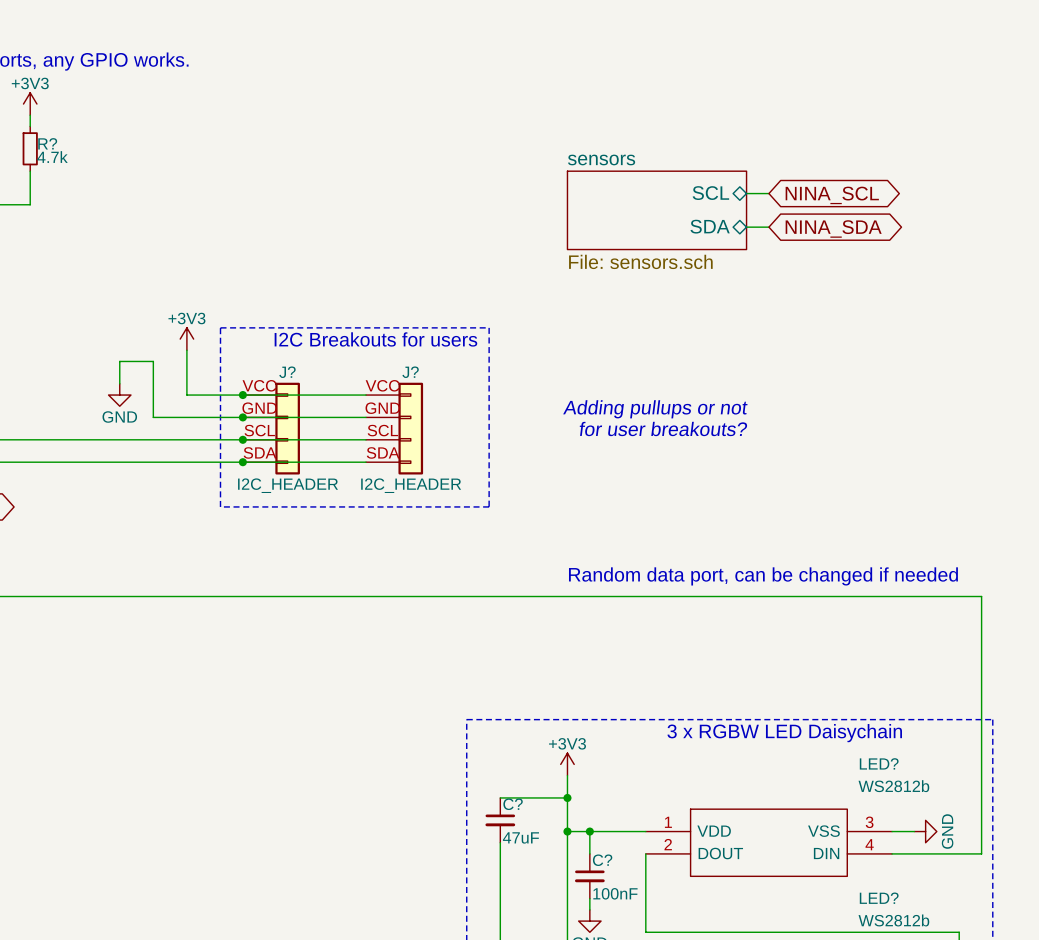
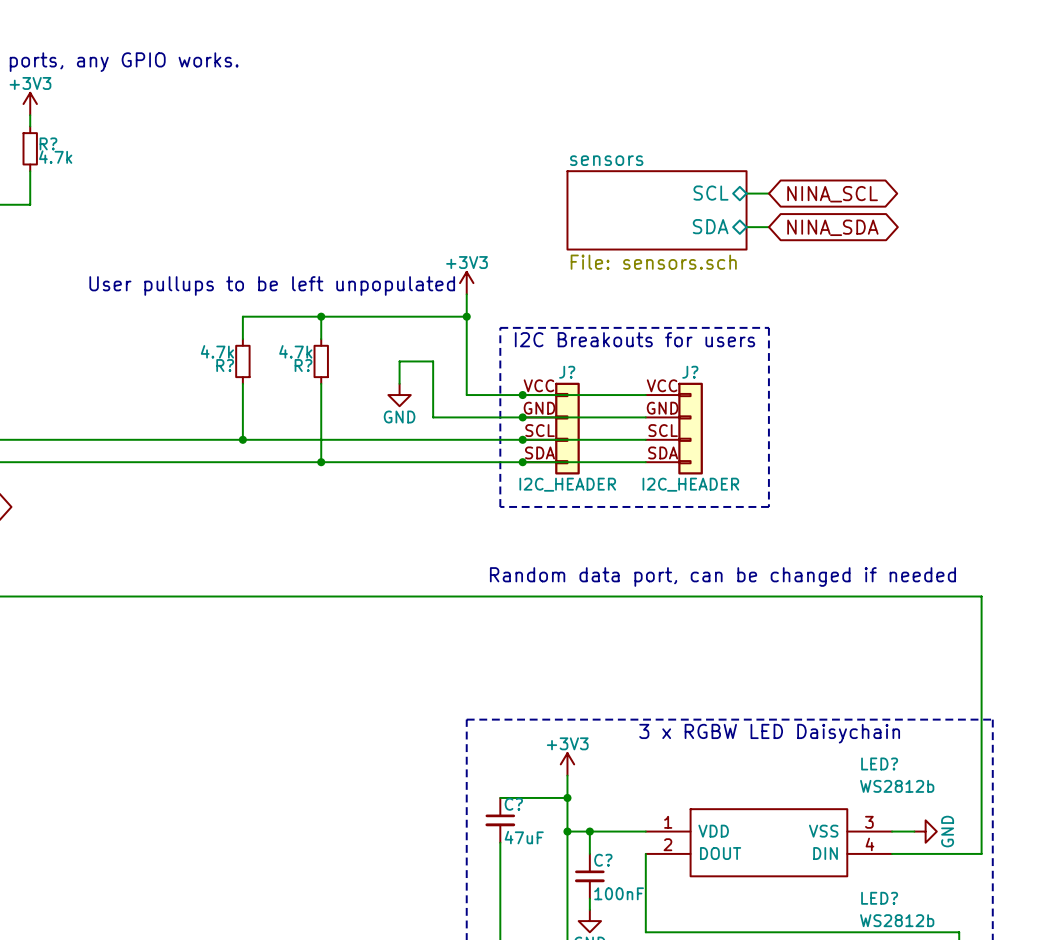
power symbol: none -> +3V3 (466, 283)
text: none -> User pullups to be left unpopulated (272, 285)
wire: none -> (466, 294) (466, 395) (645, 395)
wire: none -> (321, 316) (321, 339)
junction: none -> (321, 316)
wire: none -> (466, 316) (242, 316) (242, 339)
junction: none -> (466, 316)
line: (220, 327) (220, 506) (489, 506) (489, 327) (220, 327) -> none
line: none -> (500, 327) (500, 506) (768, 506) (768, 327) (500, 327)
power symbol: +3V3 (186, 339) -> none
text: I2C Breakouts for users (375, 339) -> none
text: none -> I2C Breakouts for users (635, 339)
wire: (186, 350) (186, 395) (366, 395) -> none
R?: none -> 4.7k (242, 361)
R?: none -> 4.7k (321, 361)
wire: (119, 383) (119, 361) (153, 361) (153, 417) (366, 417) -> none
wire: none -> (242, 383) (242, 439)
wire: none -> (321, 383) (321, 462)
wire: none -> (399, 383) (399, 361) (433, 361) (433, 417) (645, 417)
power symbol: GND (119, 395) -> none
junction: (242, 395) -> none
power symbol: none -> GND (399, 395)
junction: none -> (522, 395)
text: Adding pullups or not (655, 409) -> none
junction: (242, 417) -> none
junction: none -> (522, 417)
J?: I2C_HEADER (271, 428) -> none
J?: I2C_HEADER (394, 428) -> none
J?: none -> I2C_HEADER (551, 428)
text: for user breakouts? (663, 428) -> none
J?: none -> I2C_HEADER (674, 428)
wire: none -> (366, 439) (645, 439)
junction: none -> (522, 439)
junction: (242, 462) -> none
junction: none -> (321, 462)
wire: none -> (366, 462) (645, 462)
junction: none -> (522, 462)

